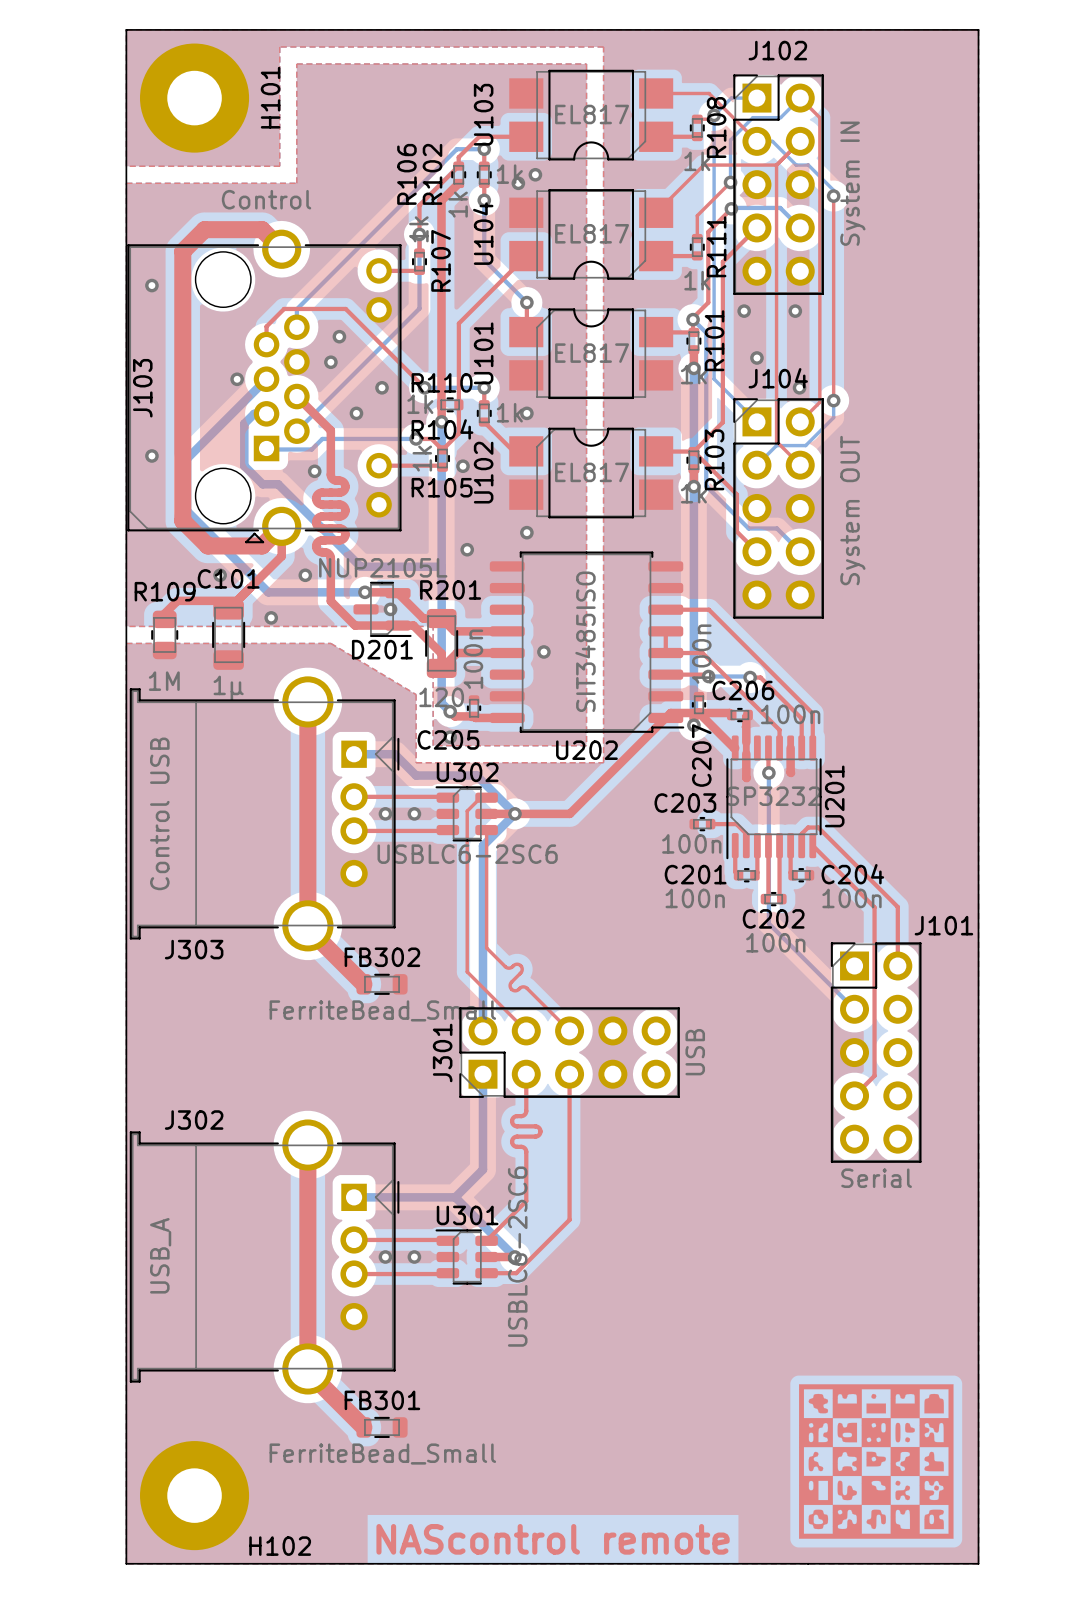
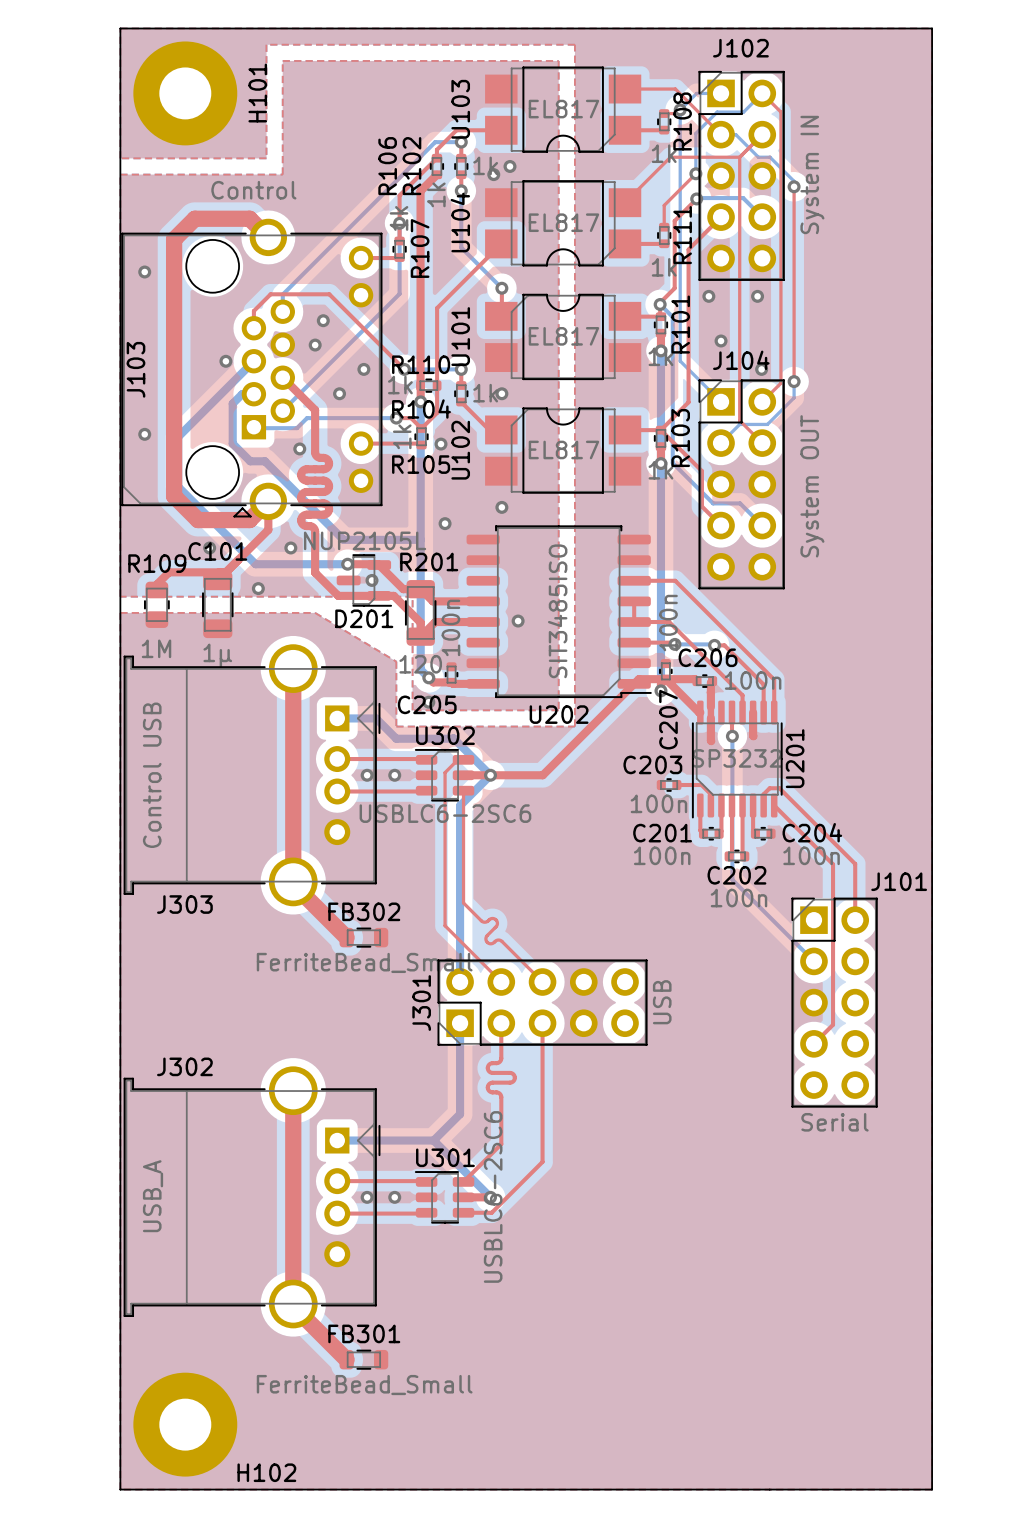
drawing: [799, 1384, 954, 1539] -> none
text: NAScontrol remote (553, 1539) -> none

